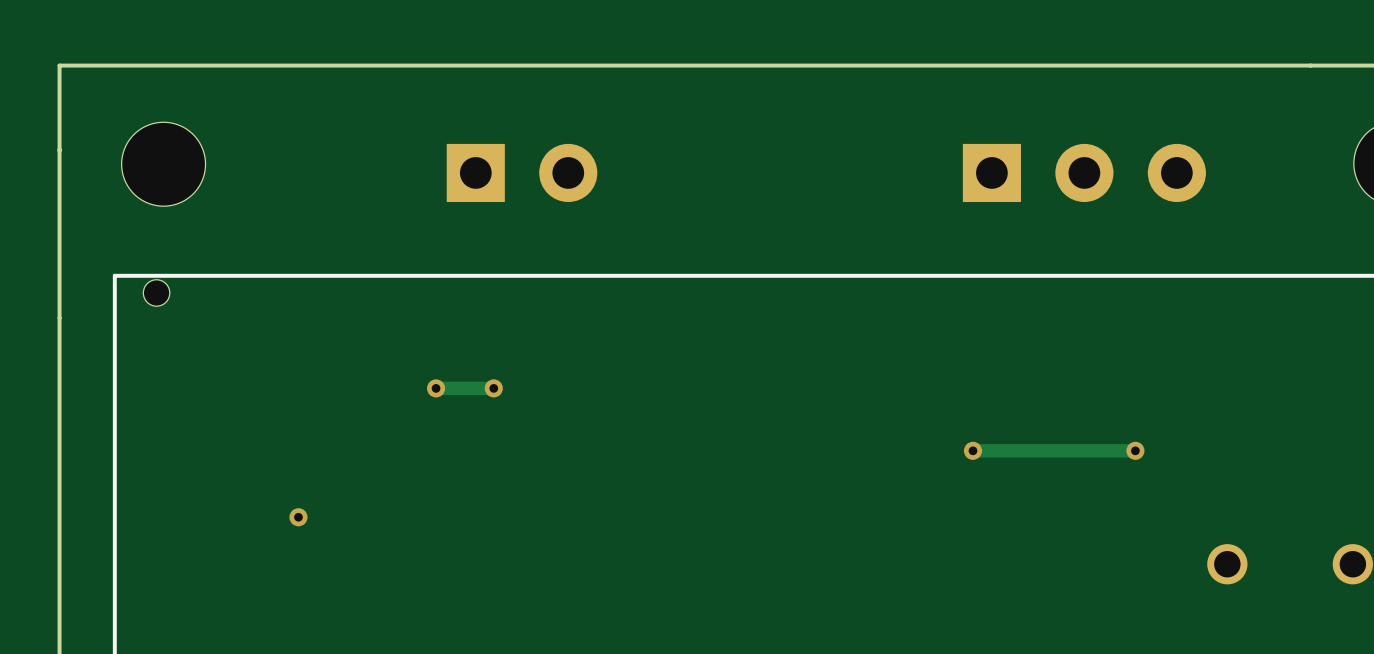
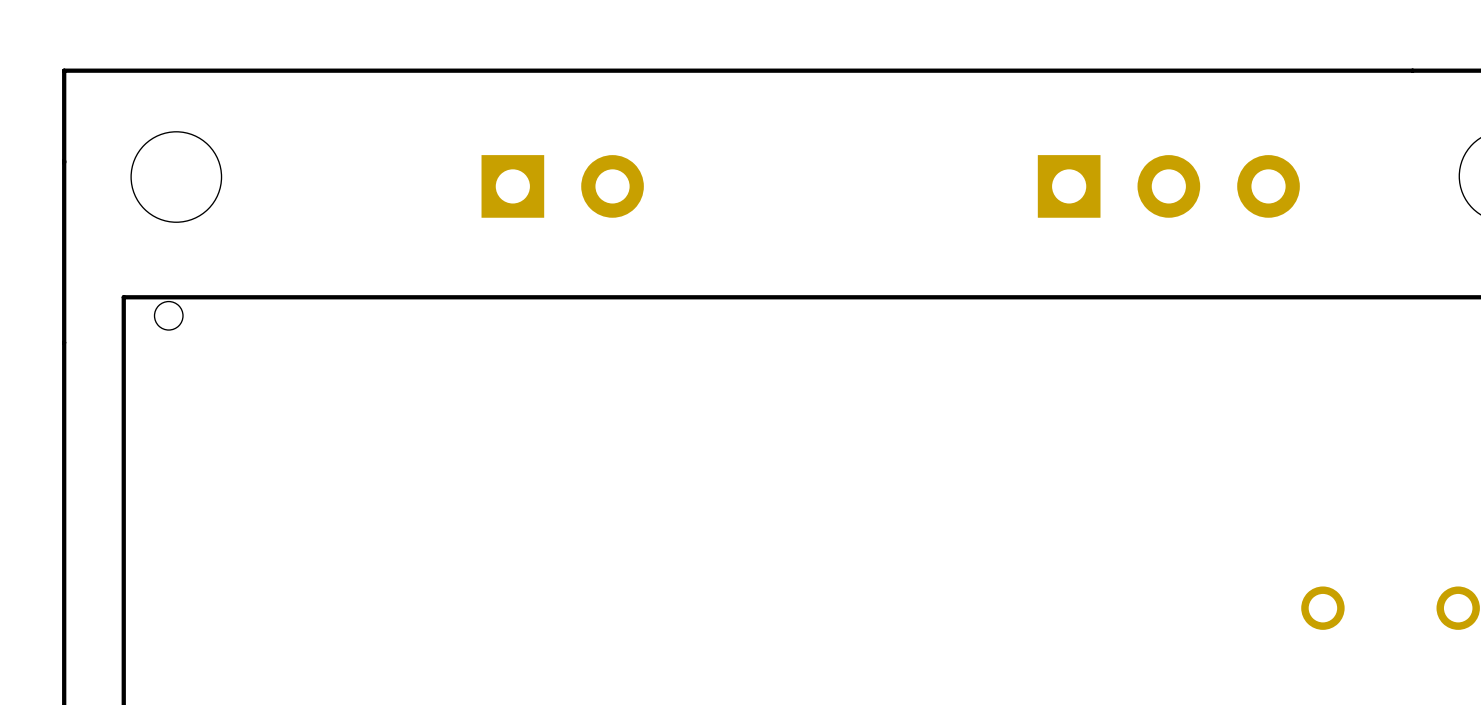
via: (436, 388) -> none
track: (493, 388) (436, 388) -> none
via: (493, 388) -> none
via: (972, 450) -> none
track: (1135, 450) (972, 450) -> none
via: (1135, 450) -> none
via: (298, 517) -> none

